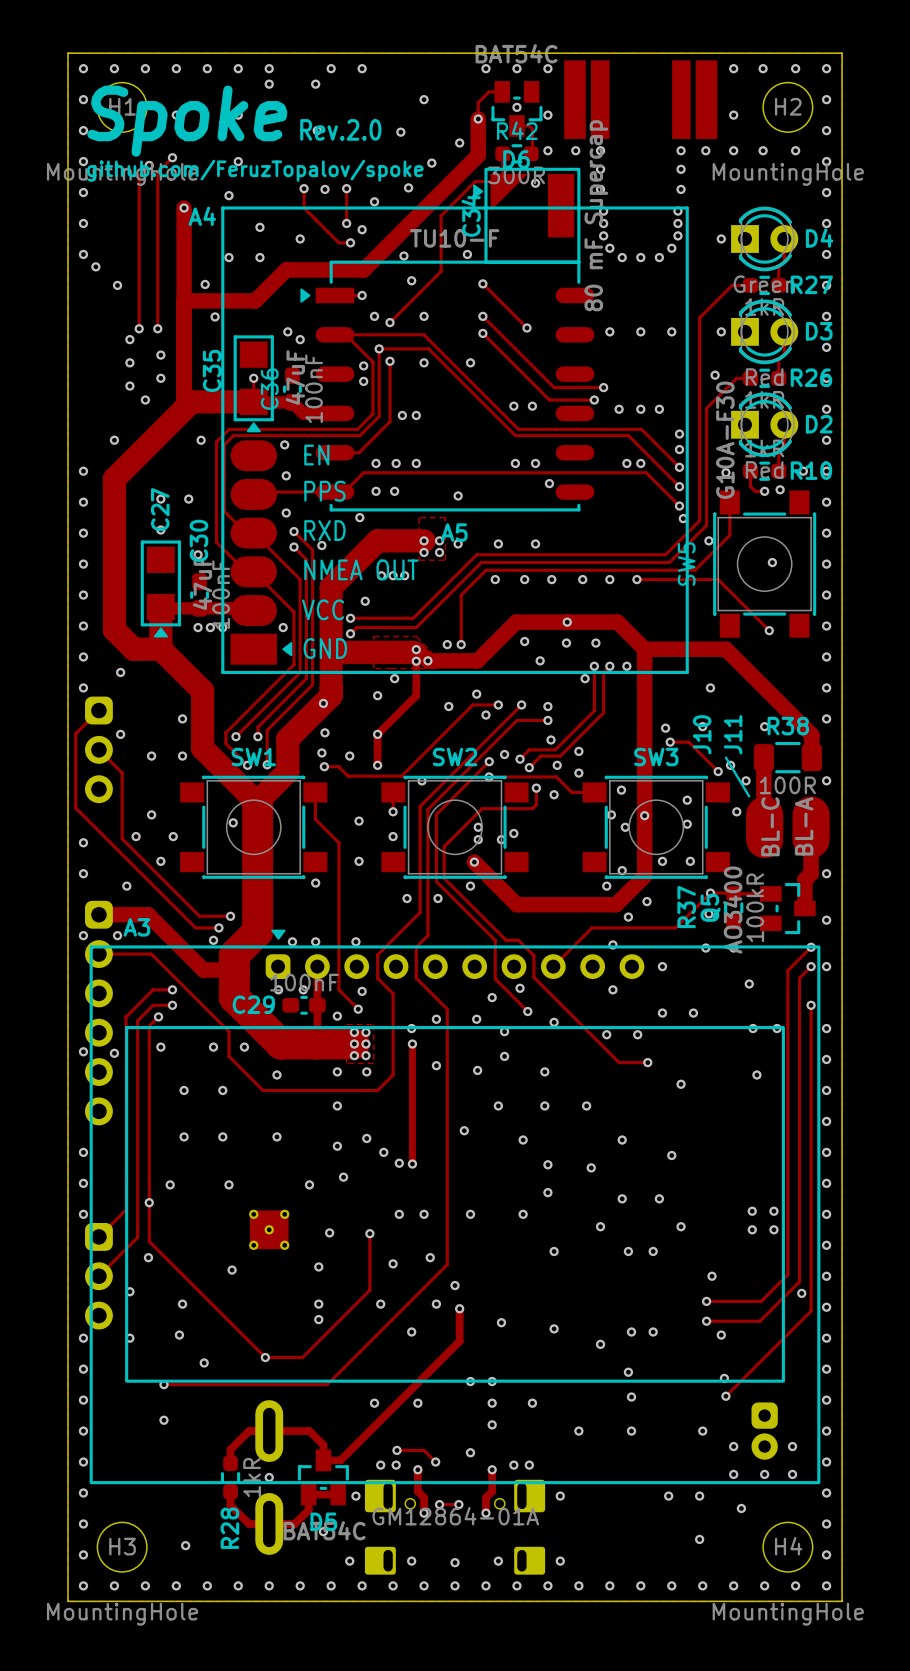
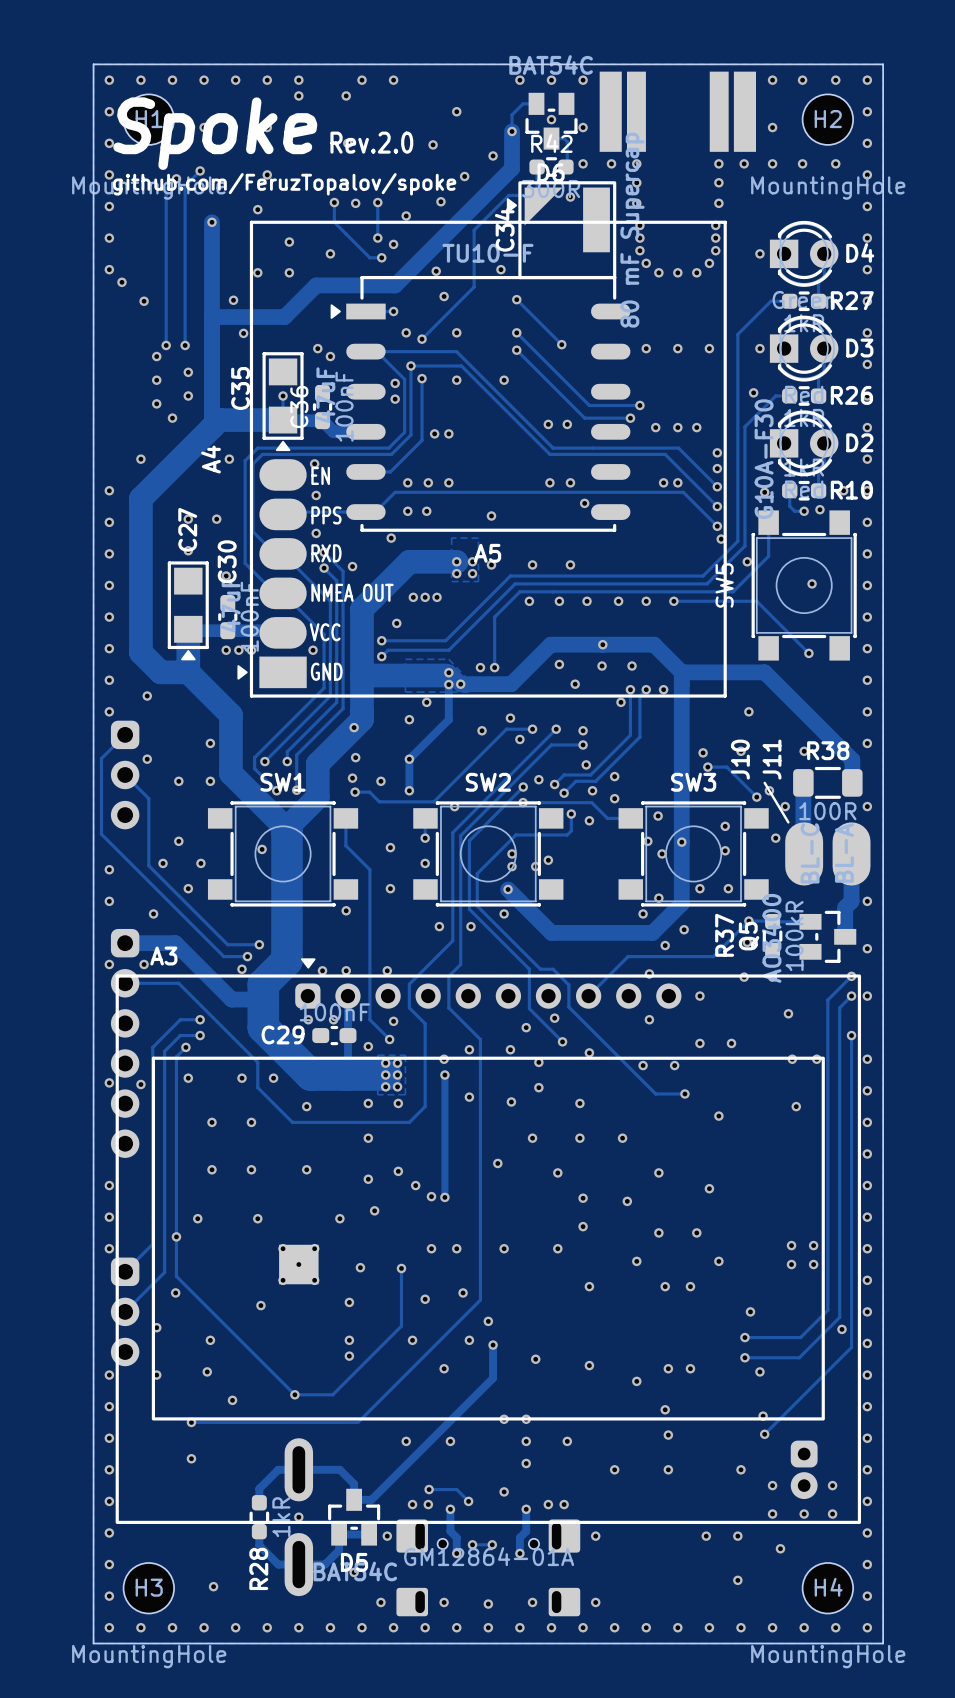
A4 footprint: [221, 206, 689, 675] -> [237, 220, 727, 698]
A4 name position: A4 (202, 216) -> A4 (211, 459)

